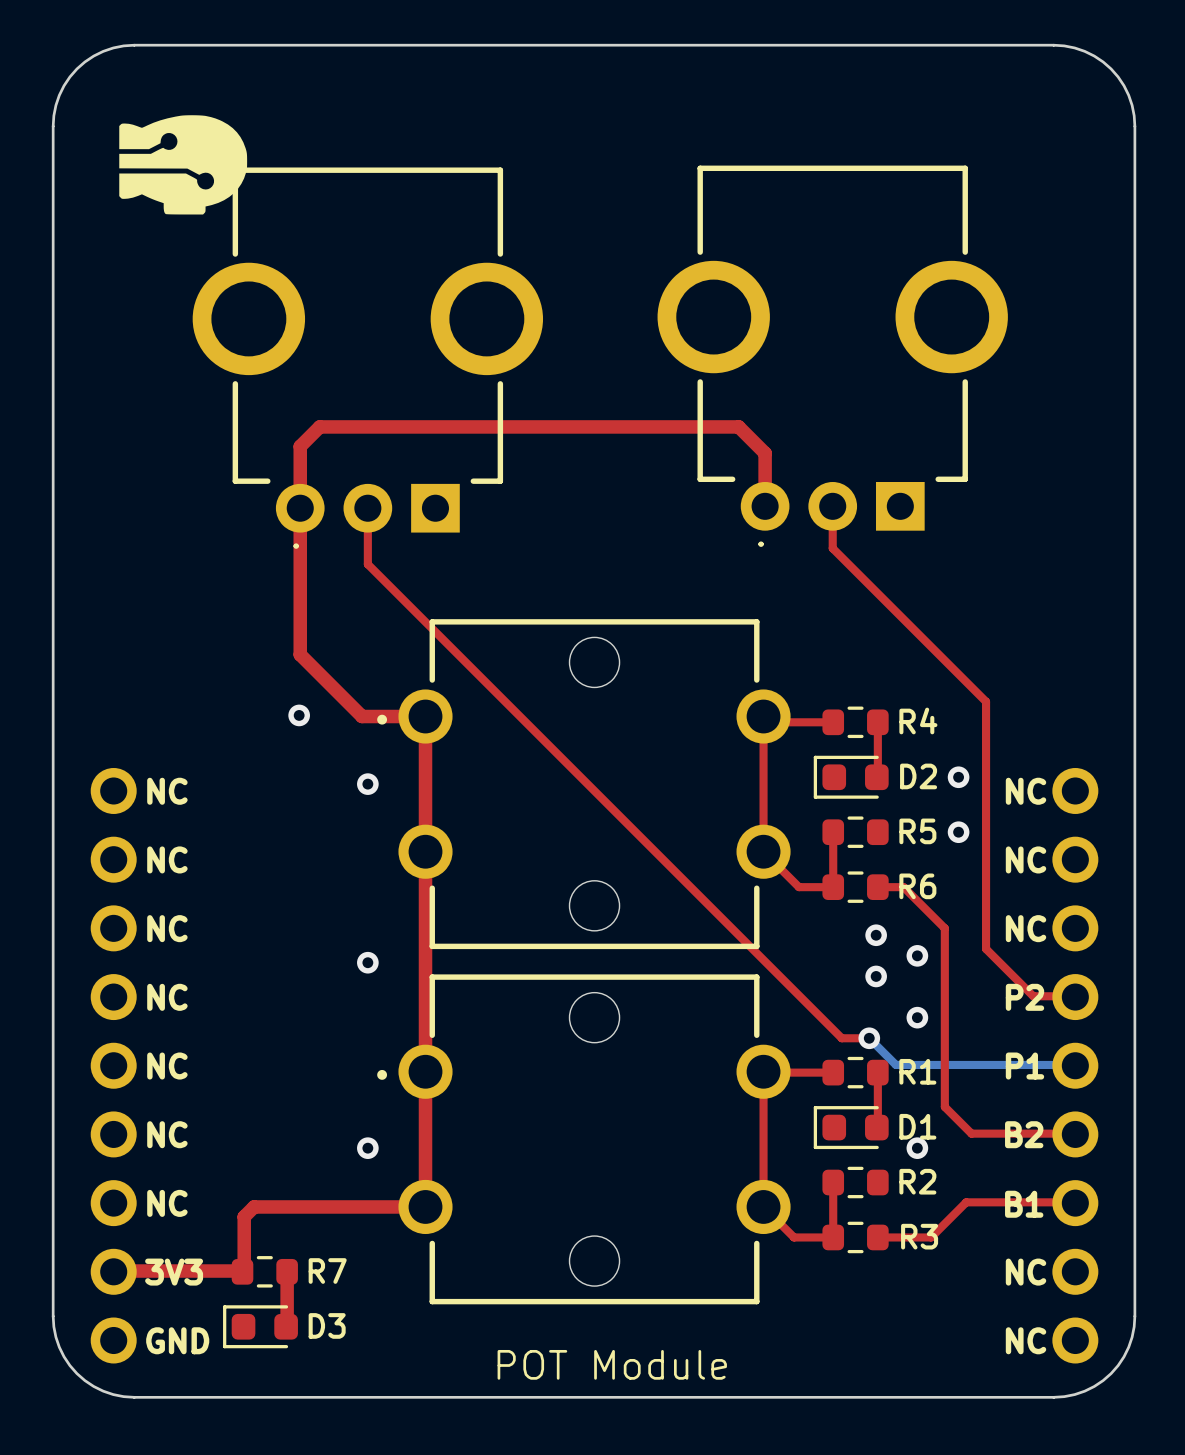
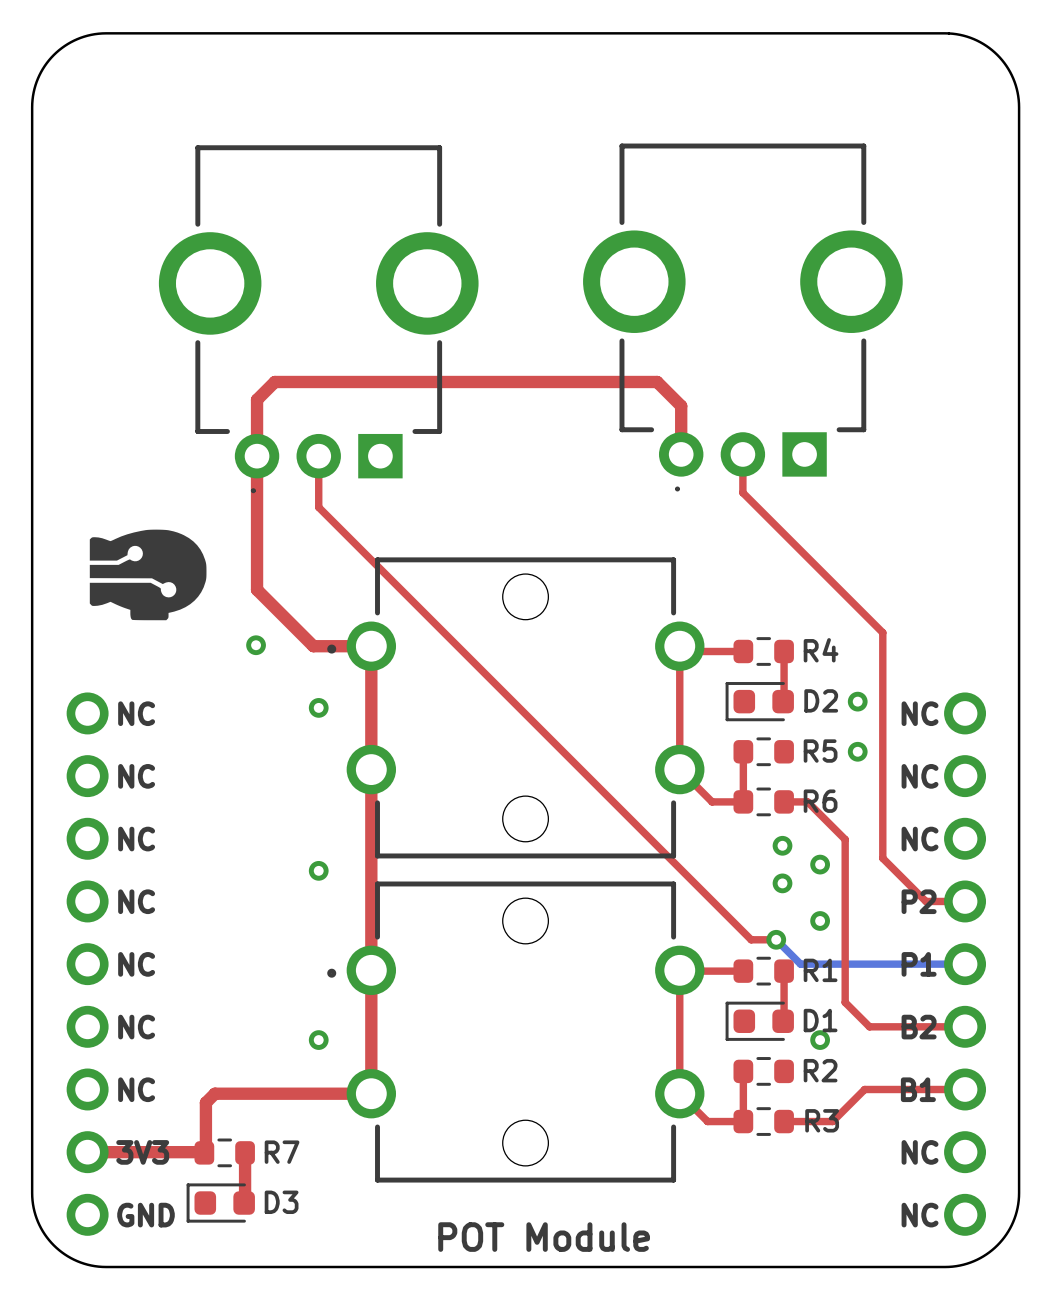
part footprint: [51, 43, 1137, 1399] -> [30, 32, 1021, 1269]

